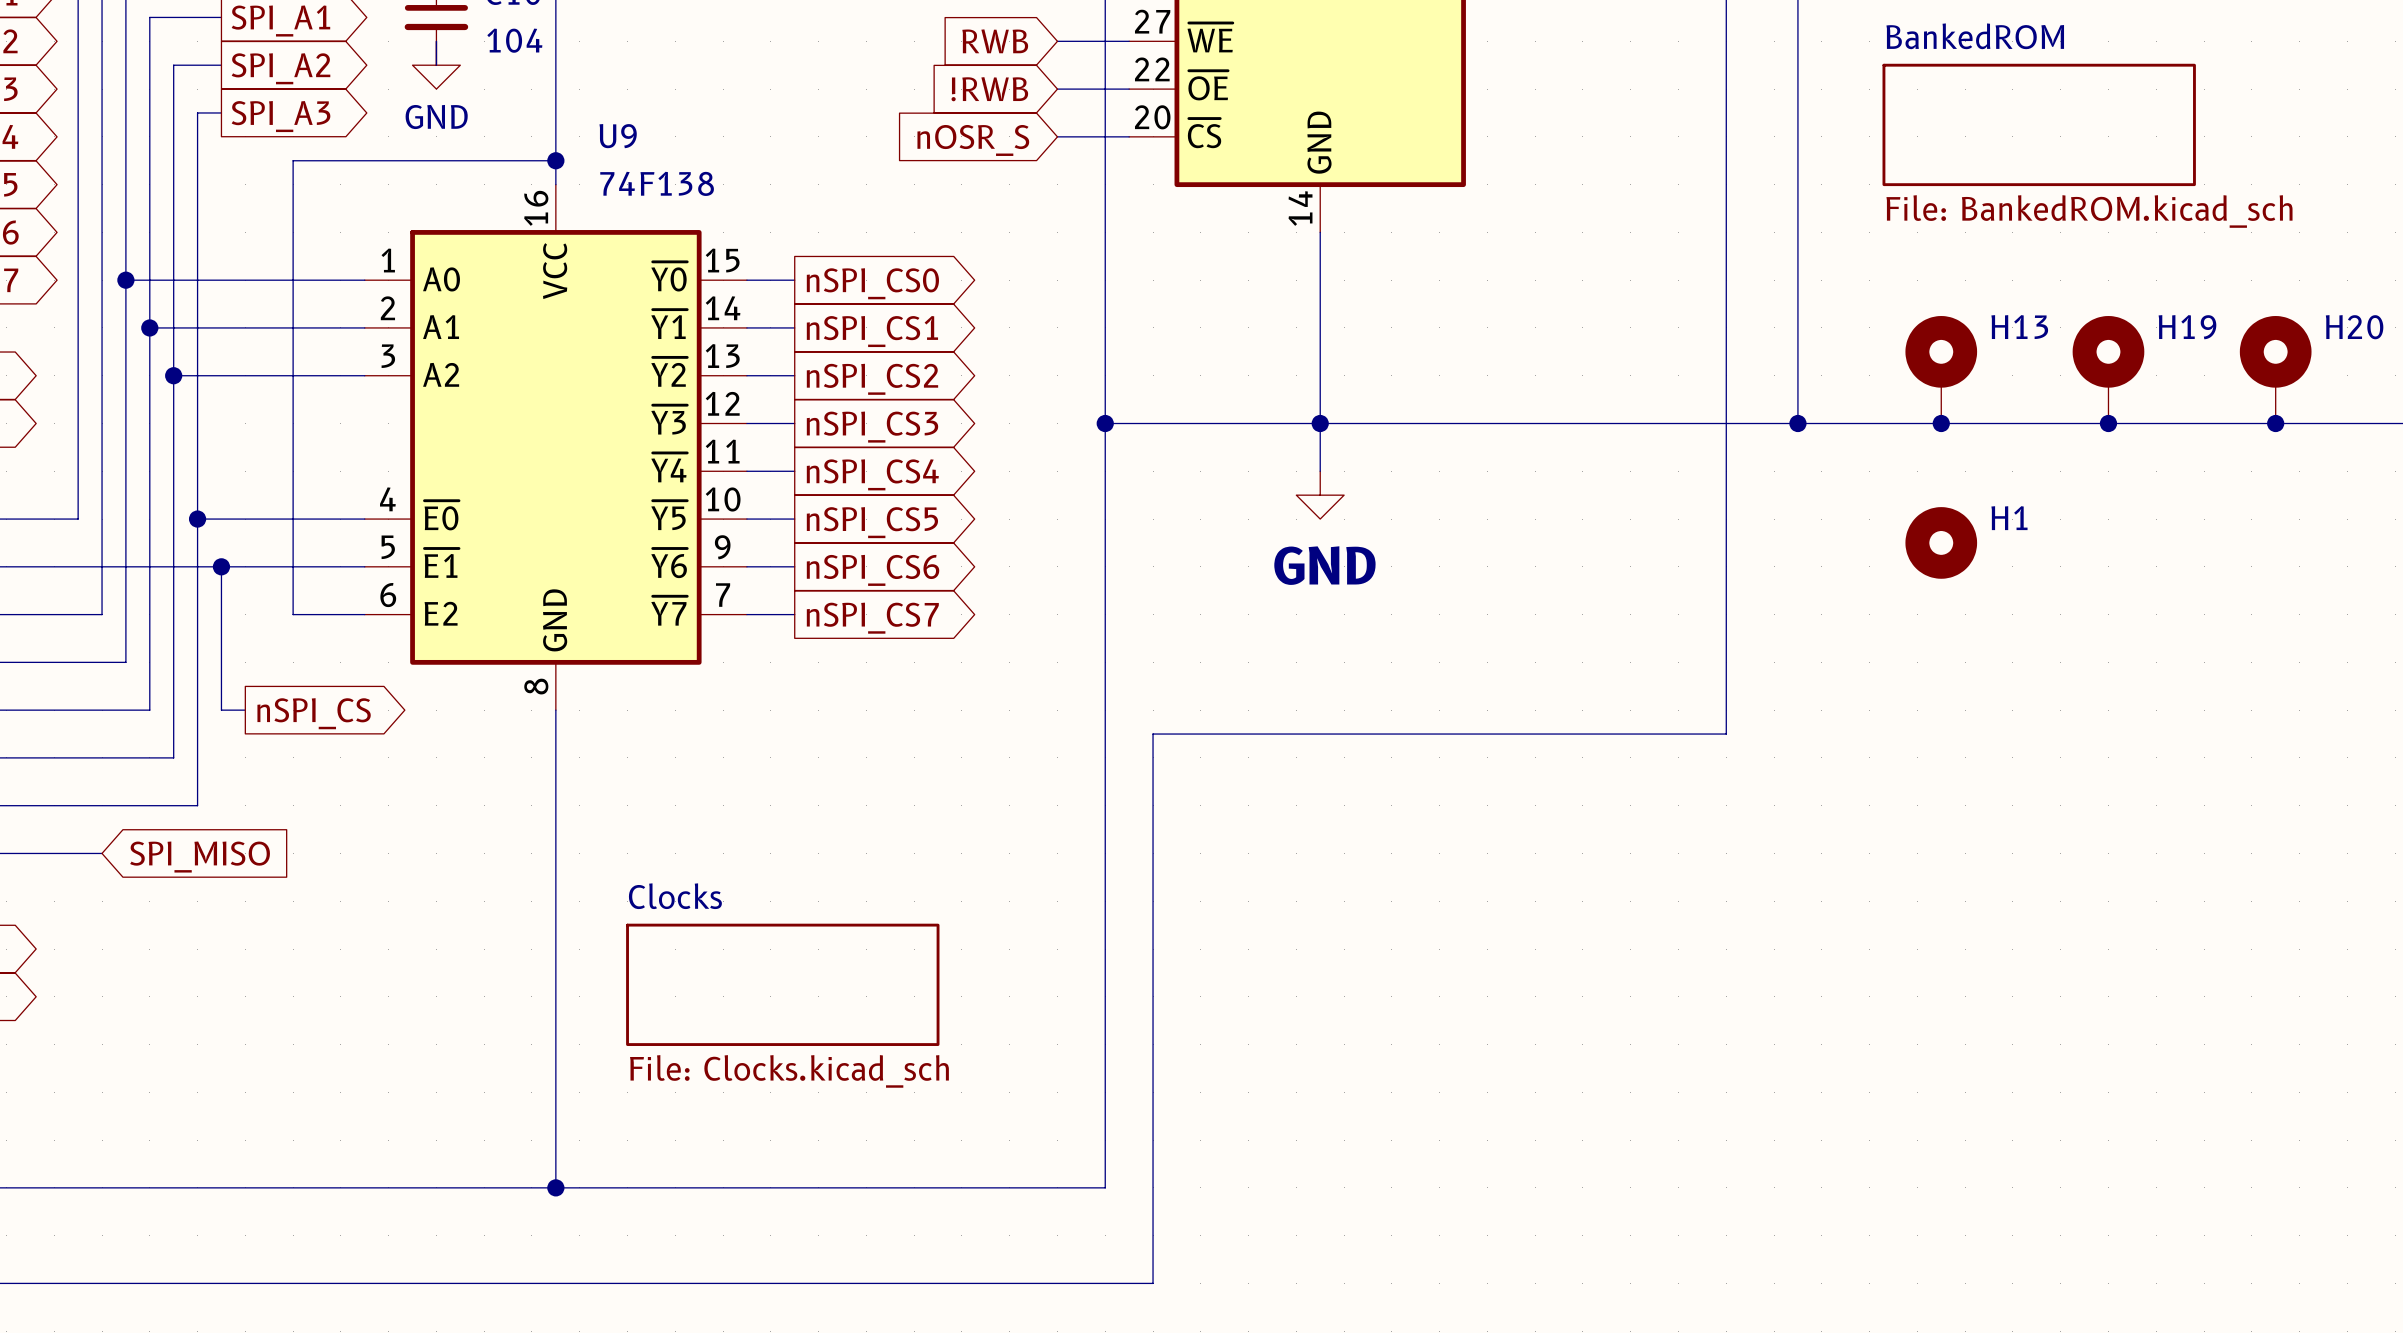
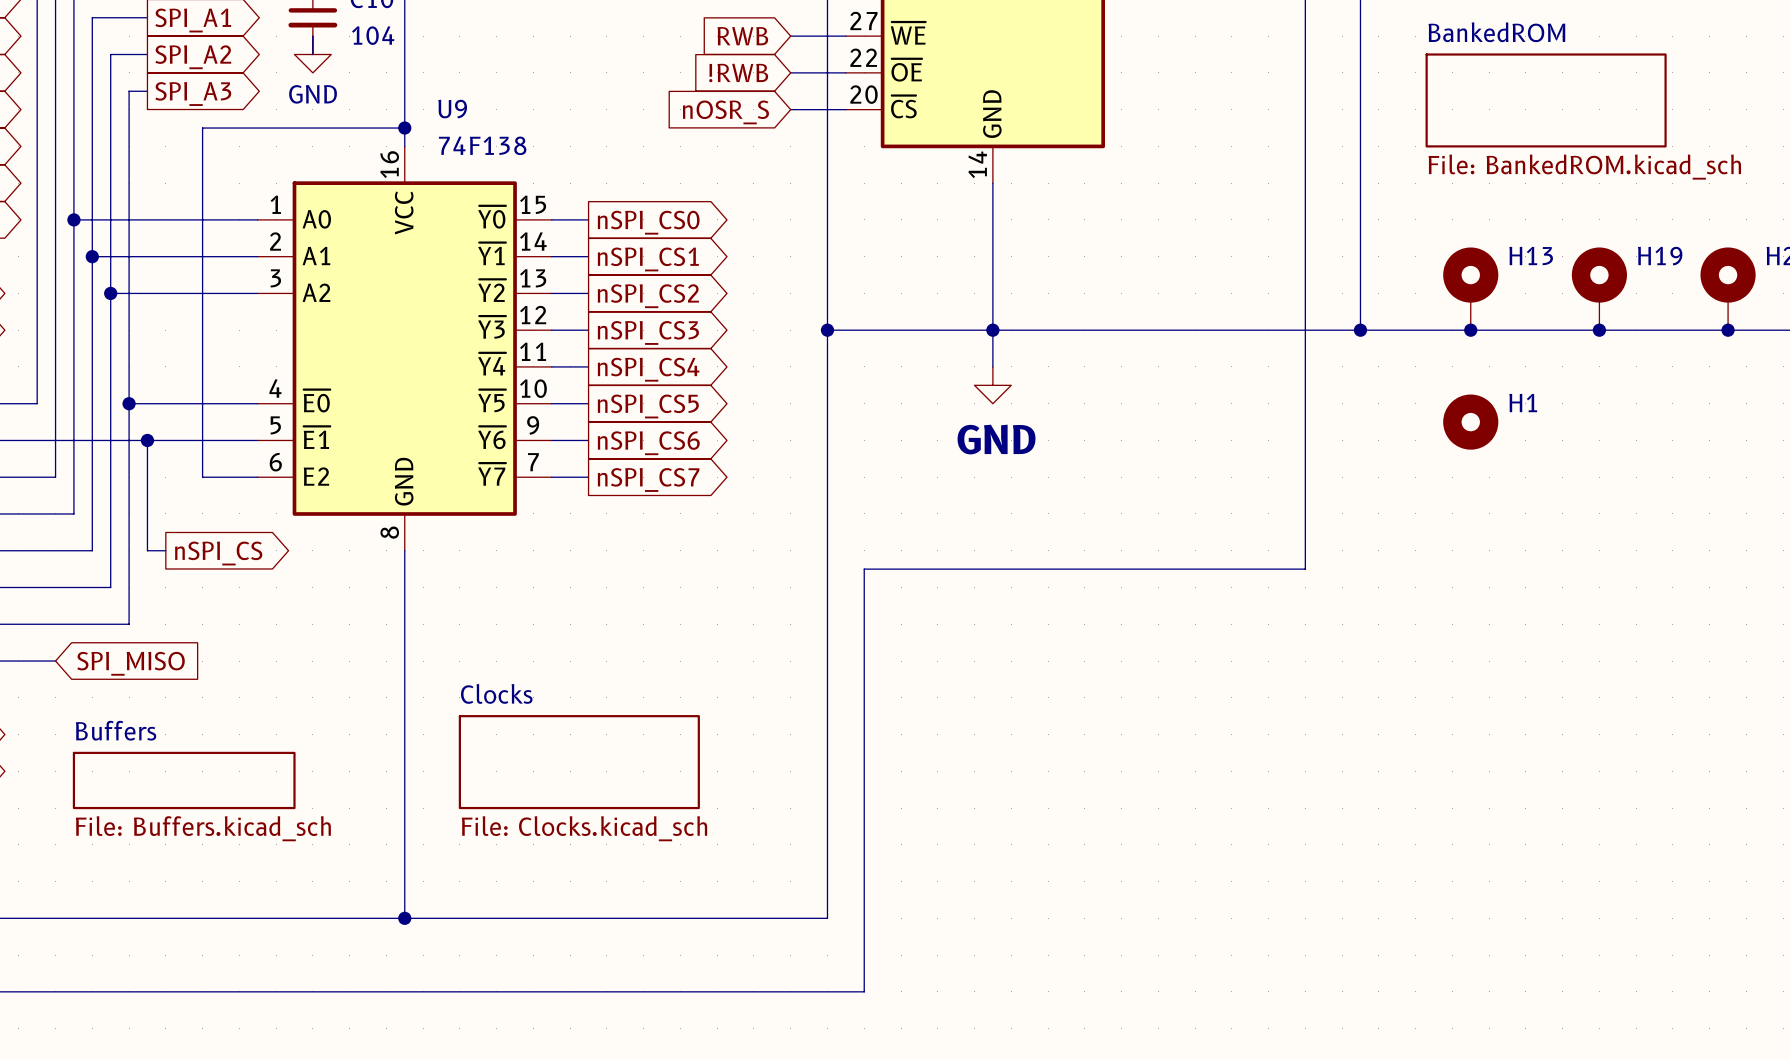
sheet Buffers: none -> File: Buffers.kicad_sch (184, 780)

